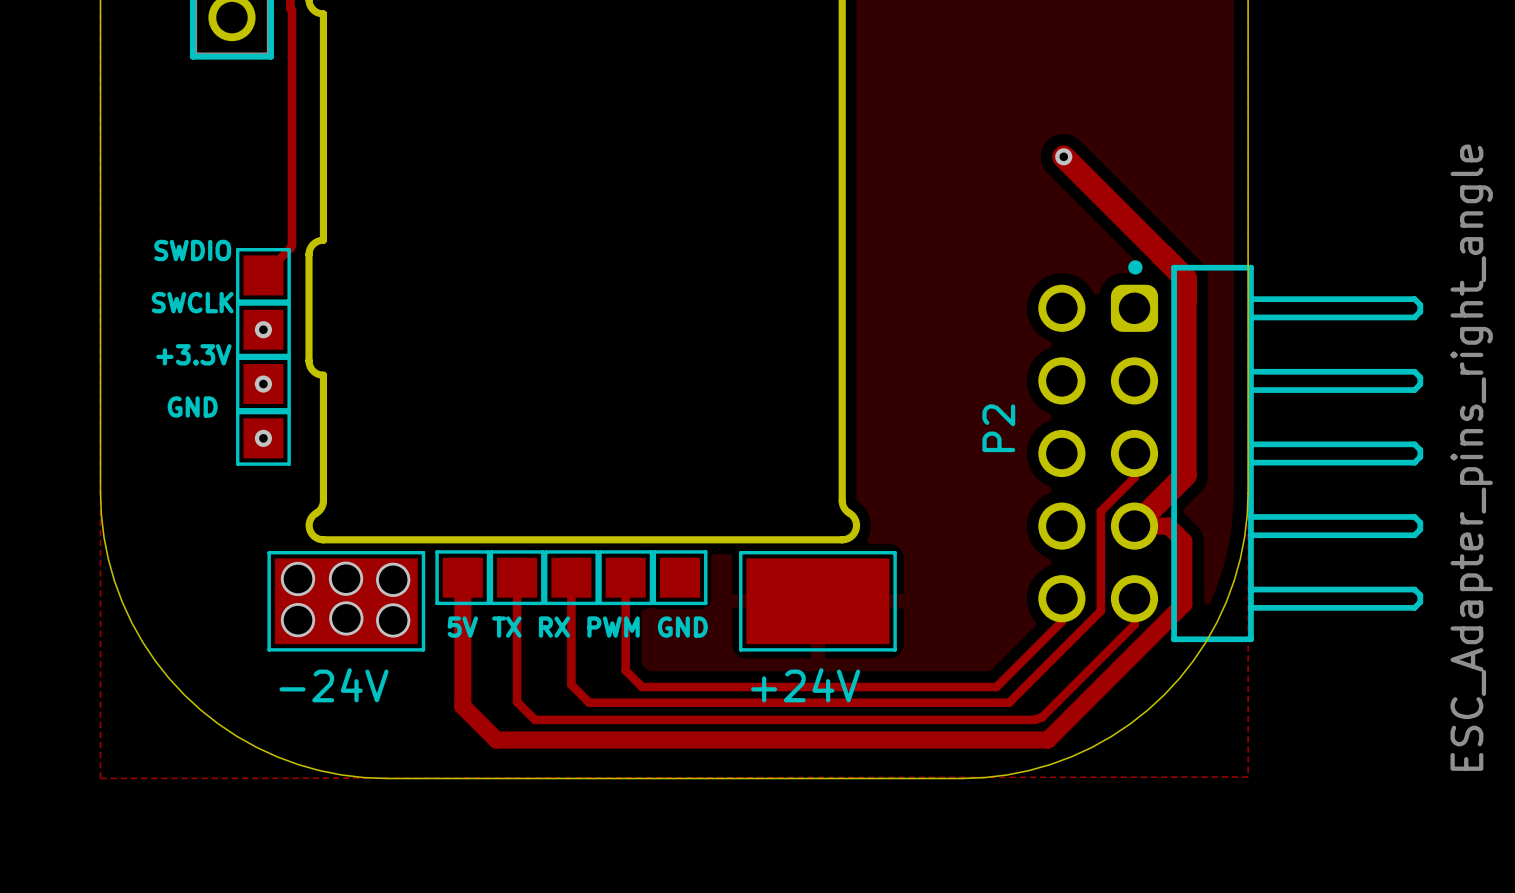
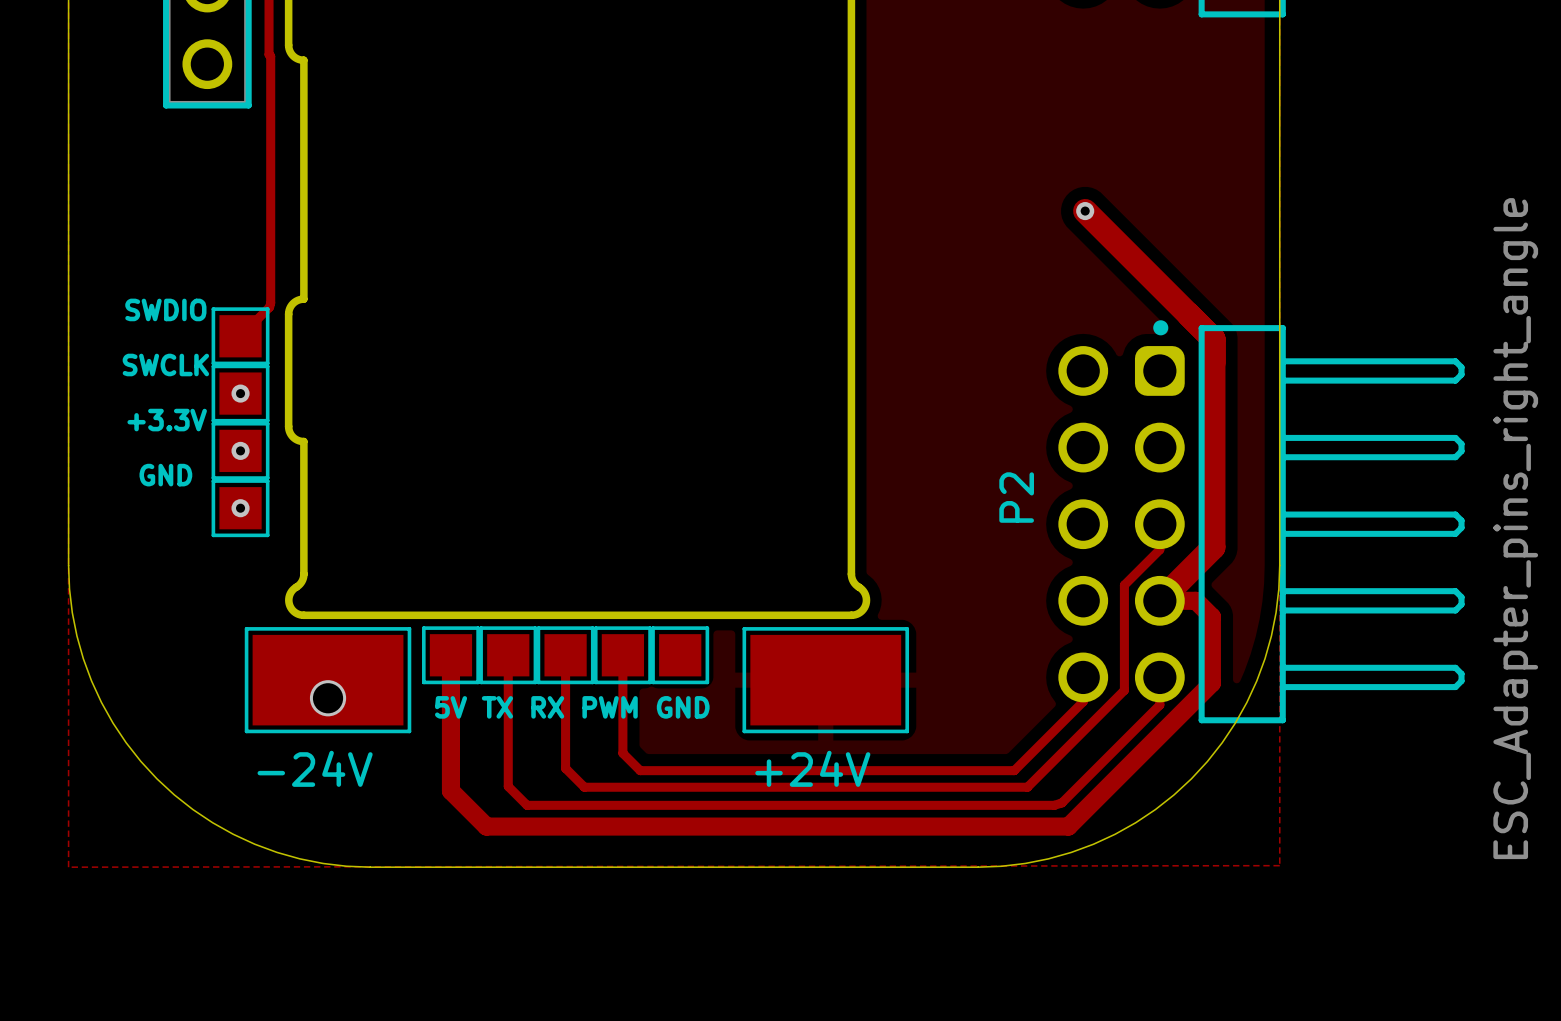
via: (298, 578) -> none
via: (346, 578) -> none
via: (393, 579) -> none
via: (298, 620) -> none
via: (393, 620) -> none

